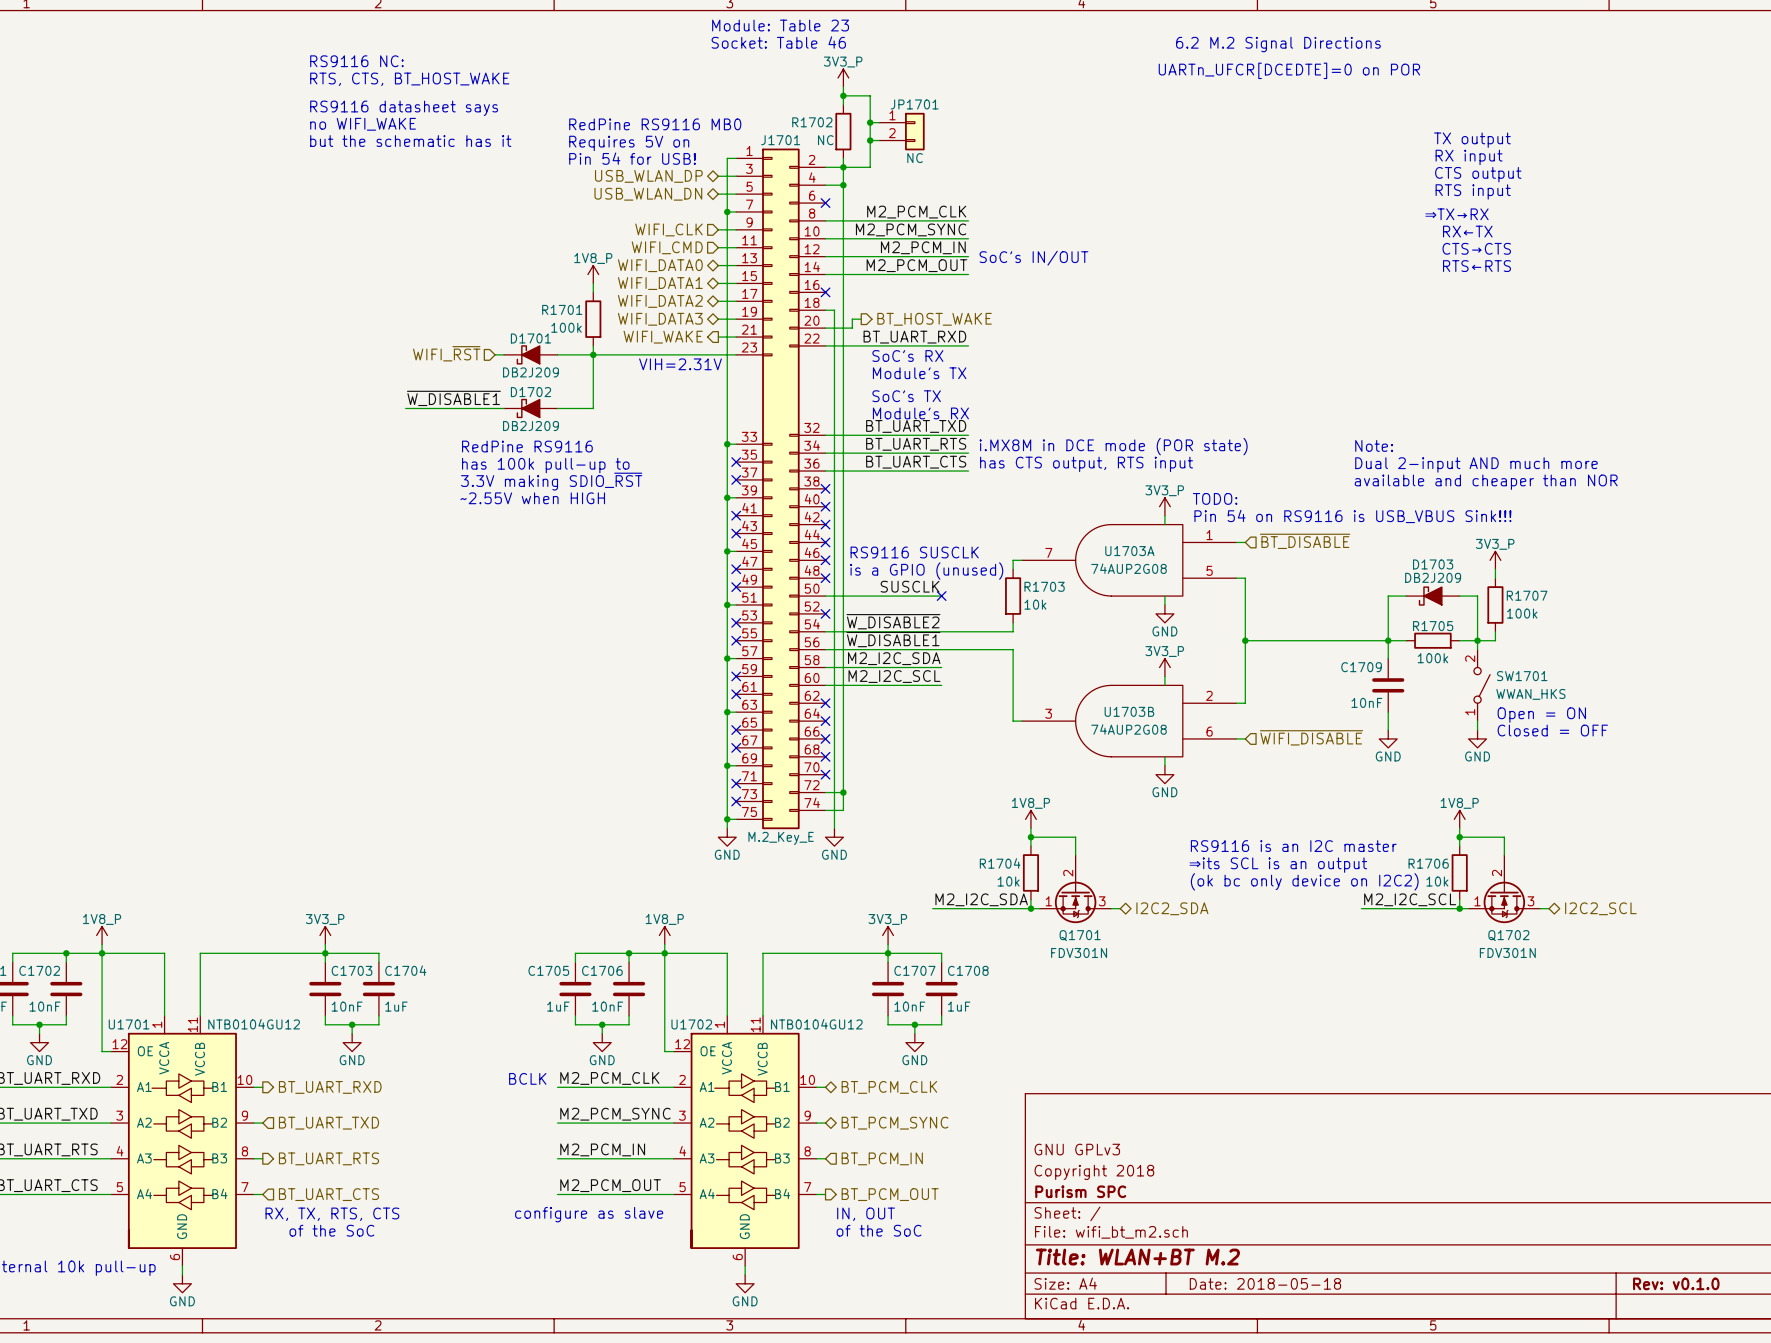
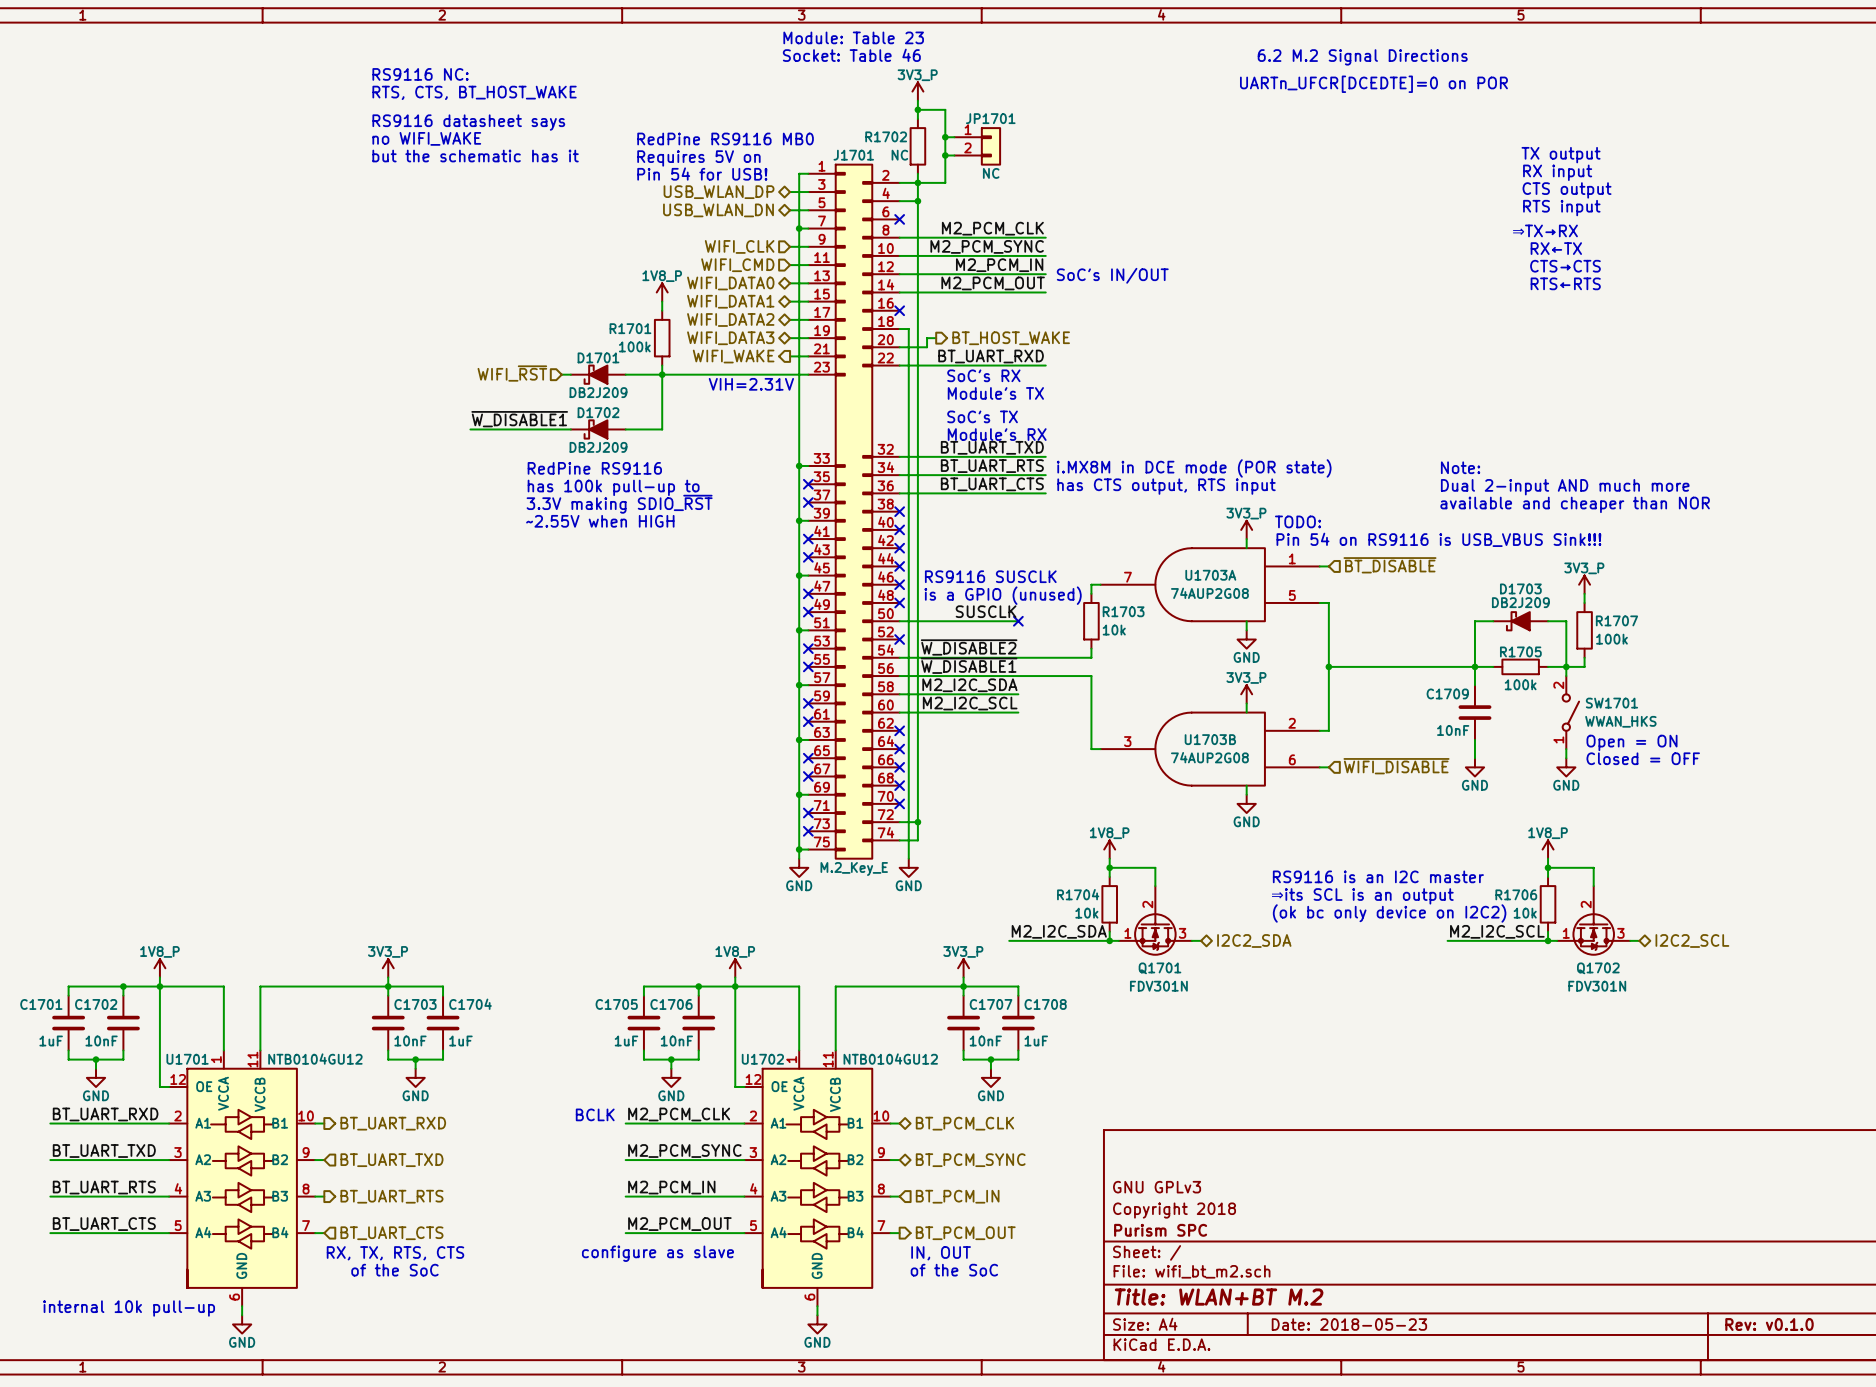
title block: Date: 2018-05-18 (1265, 1283) -> Date: 2018-05-23 (1349, 1324)

